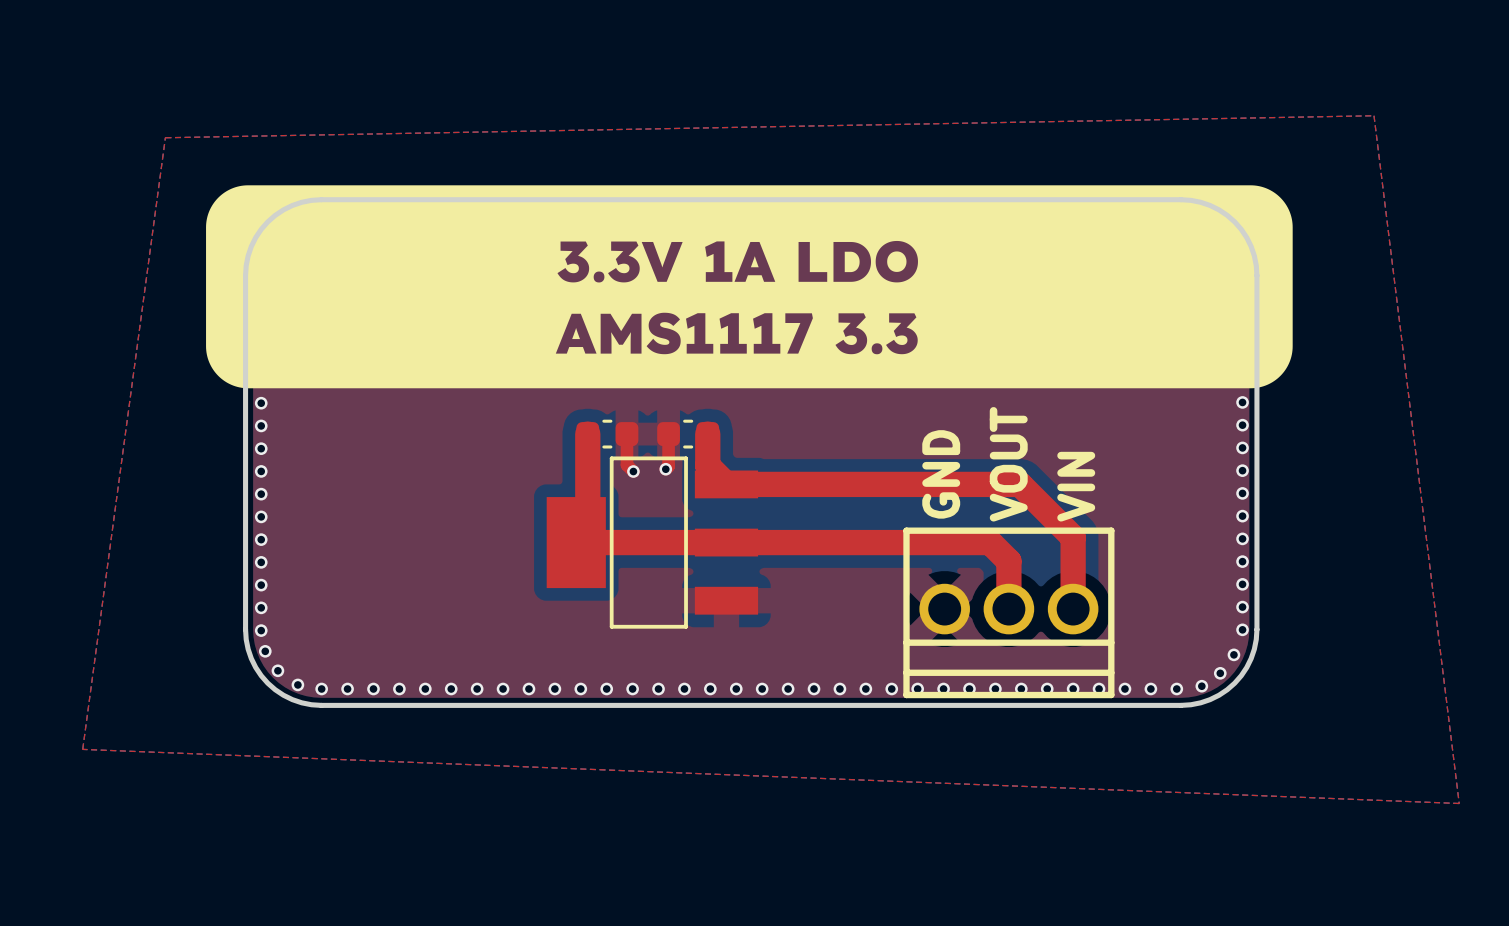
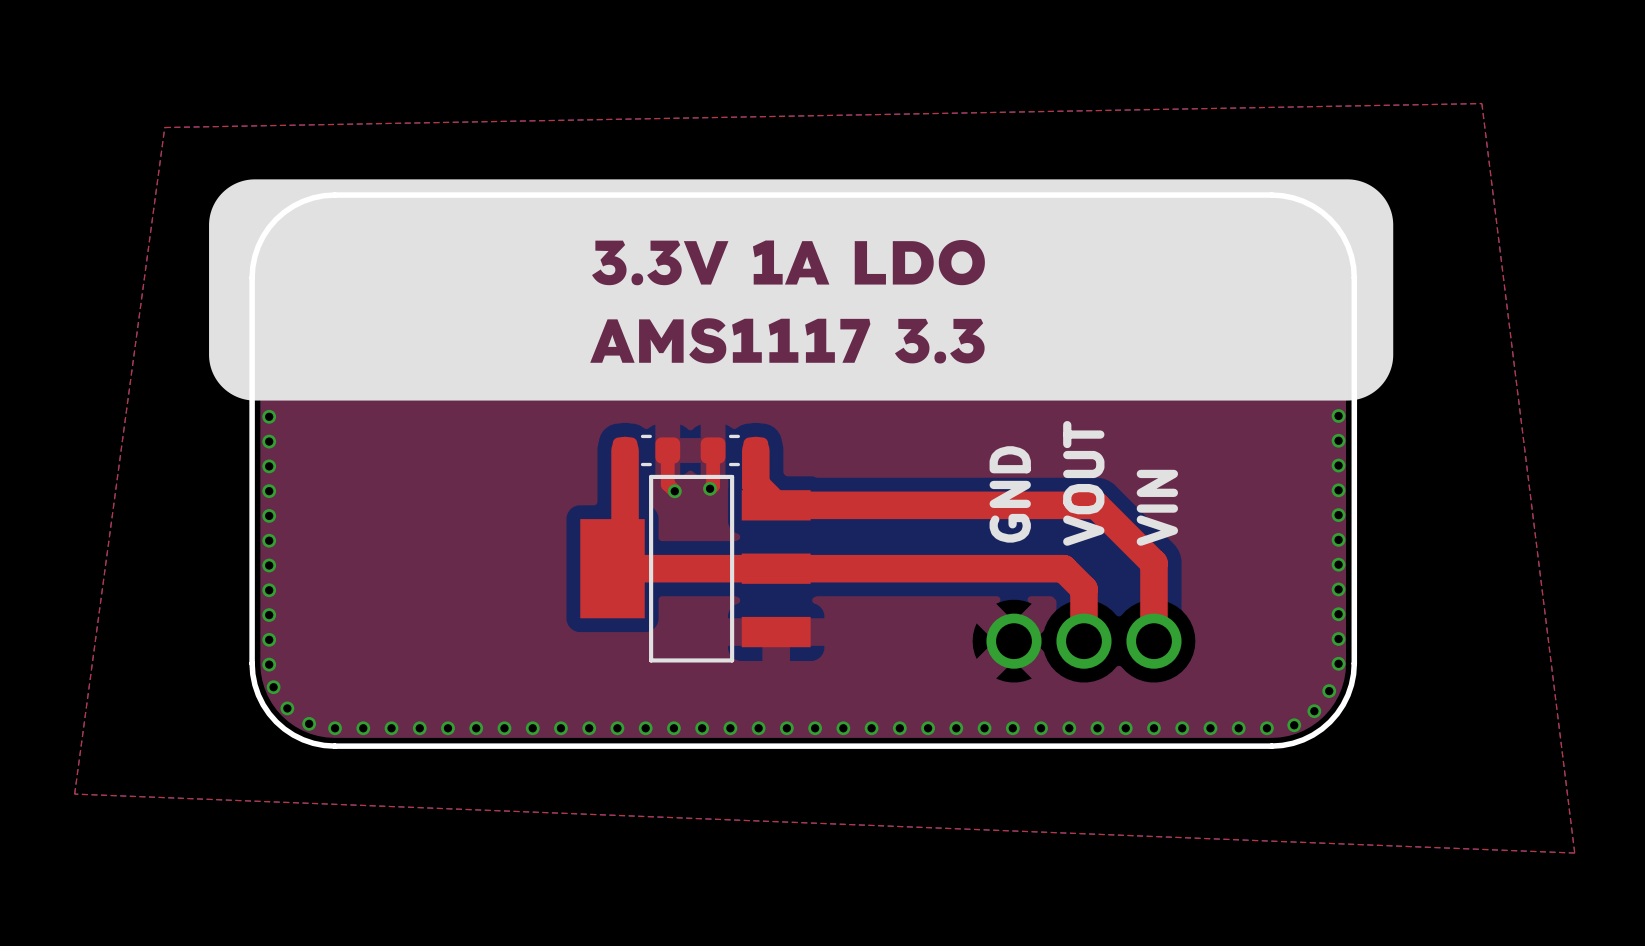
part footprint: [903, 527, 1115, 699] -> [986, 613, 1182, 669]

